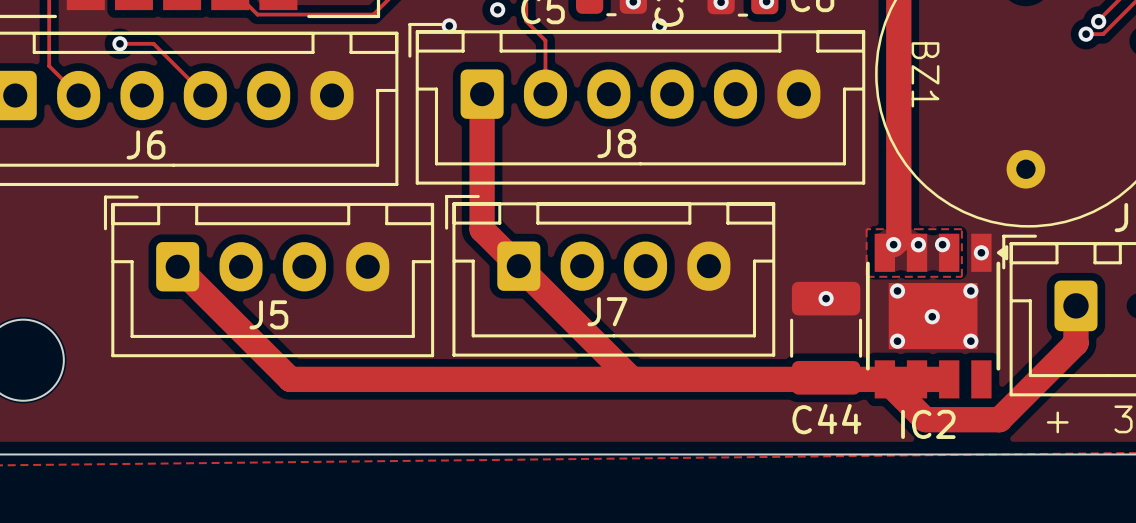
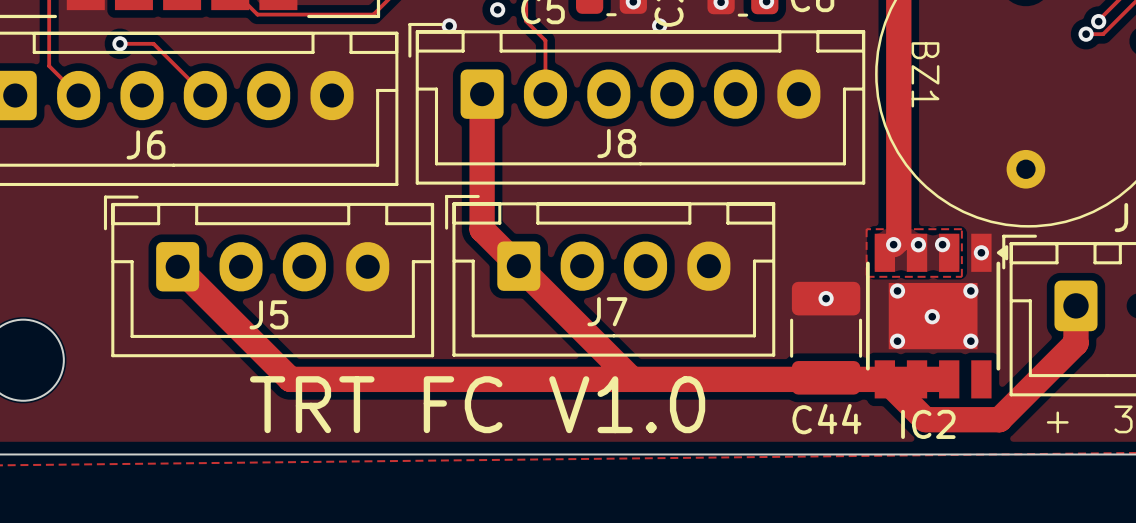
text: none -> TRT FC V1.0 (477, 404)

